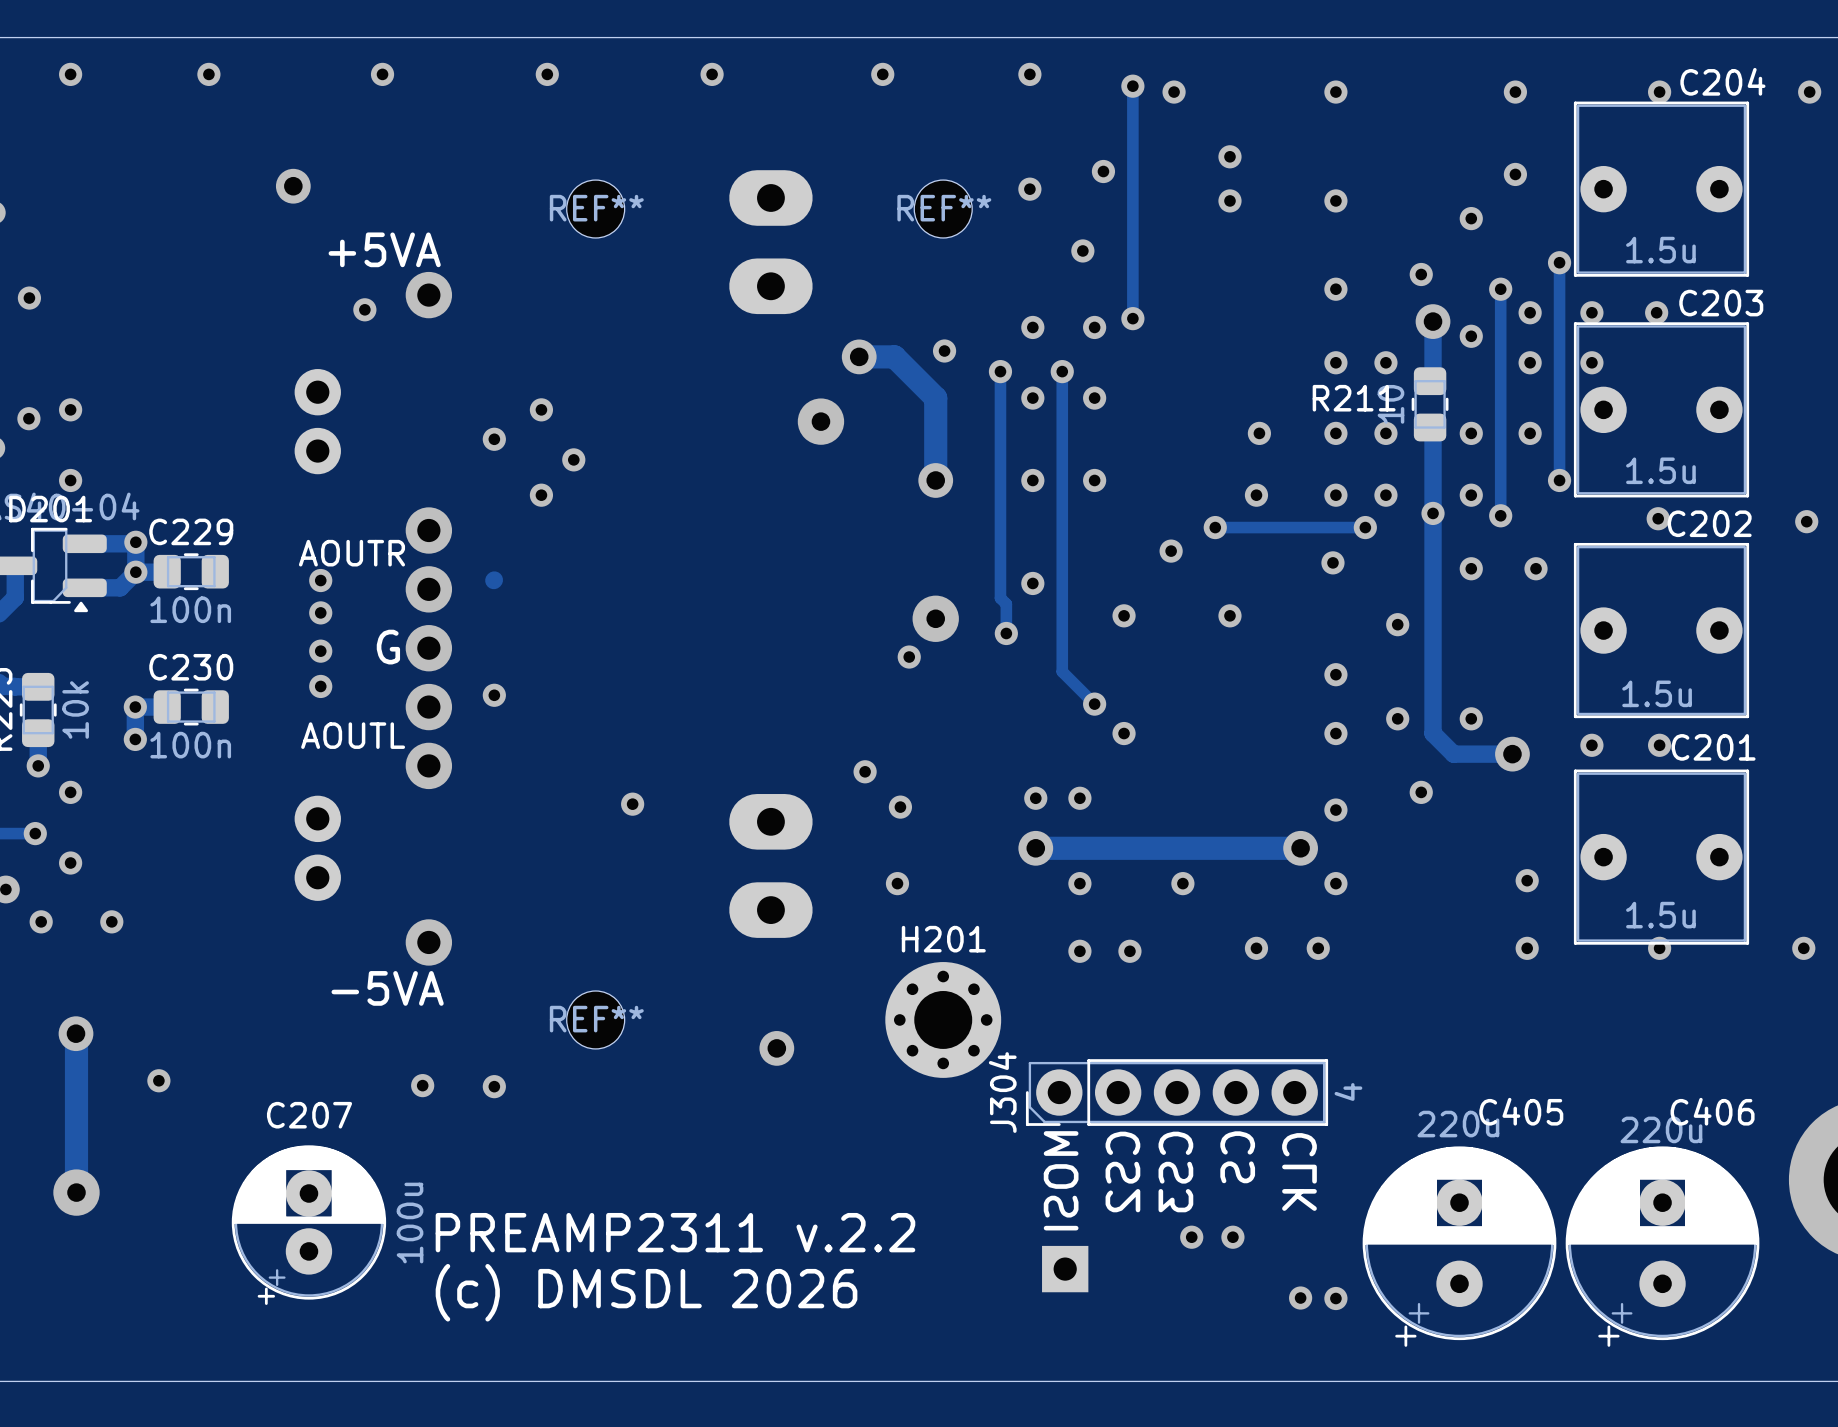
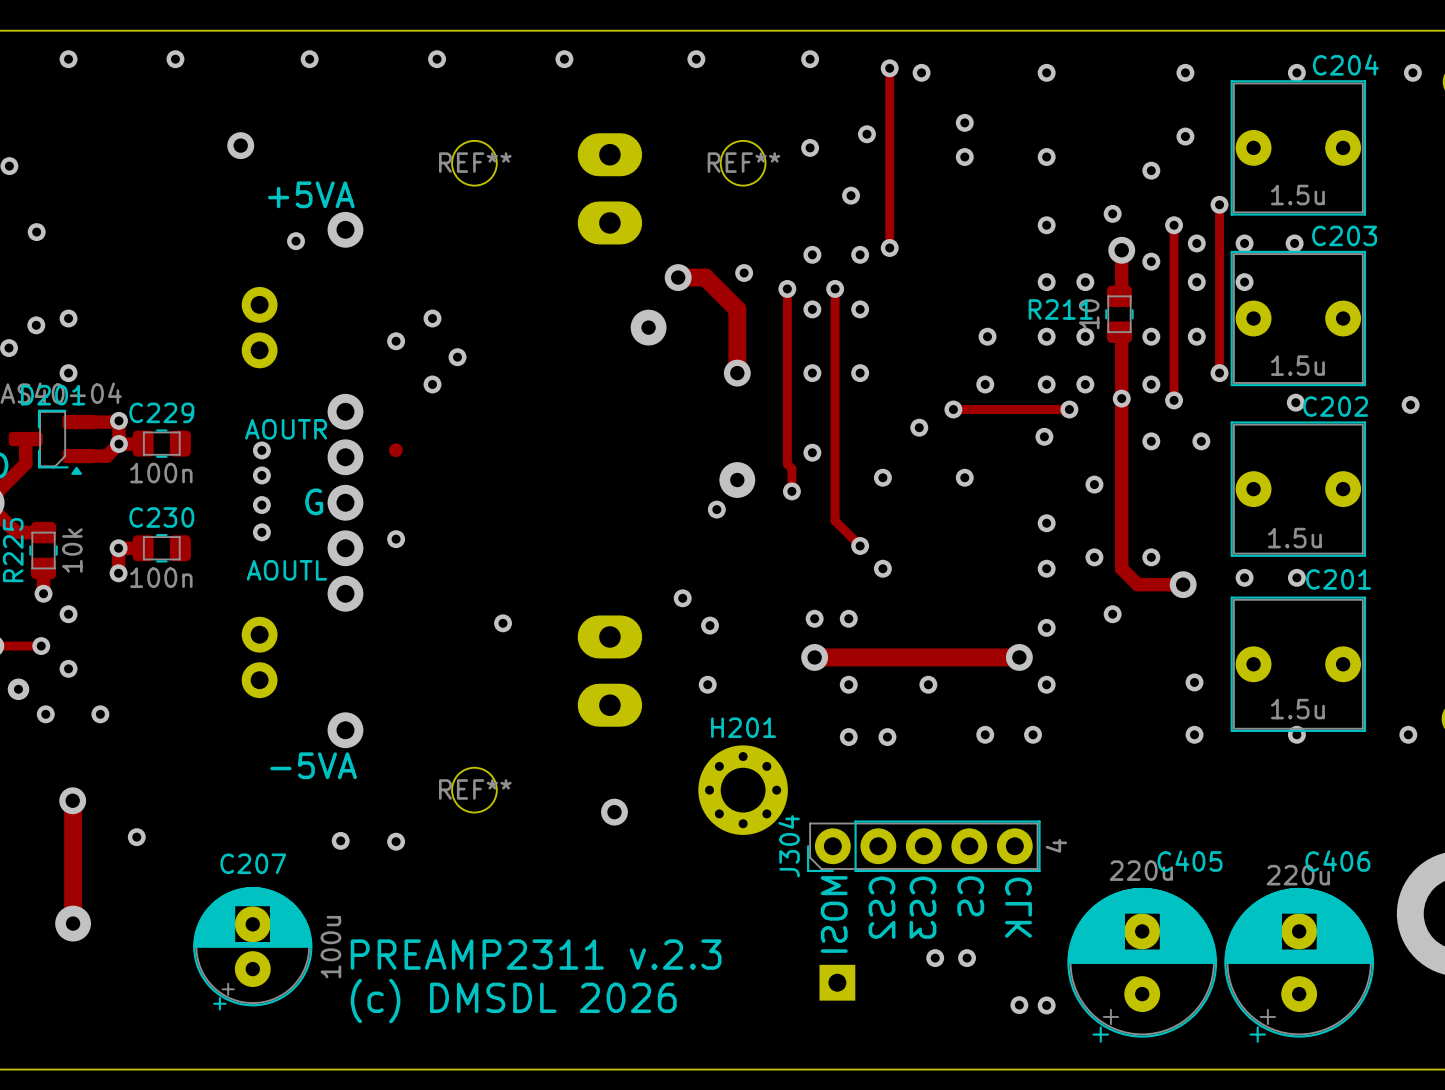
text: PREAMP2311 v.2.2 (675, 1232) -> PREAMP2311 v.2.3 (536, 954)

